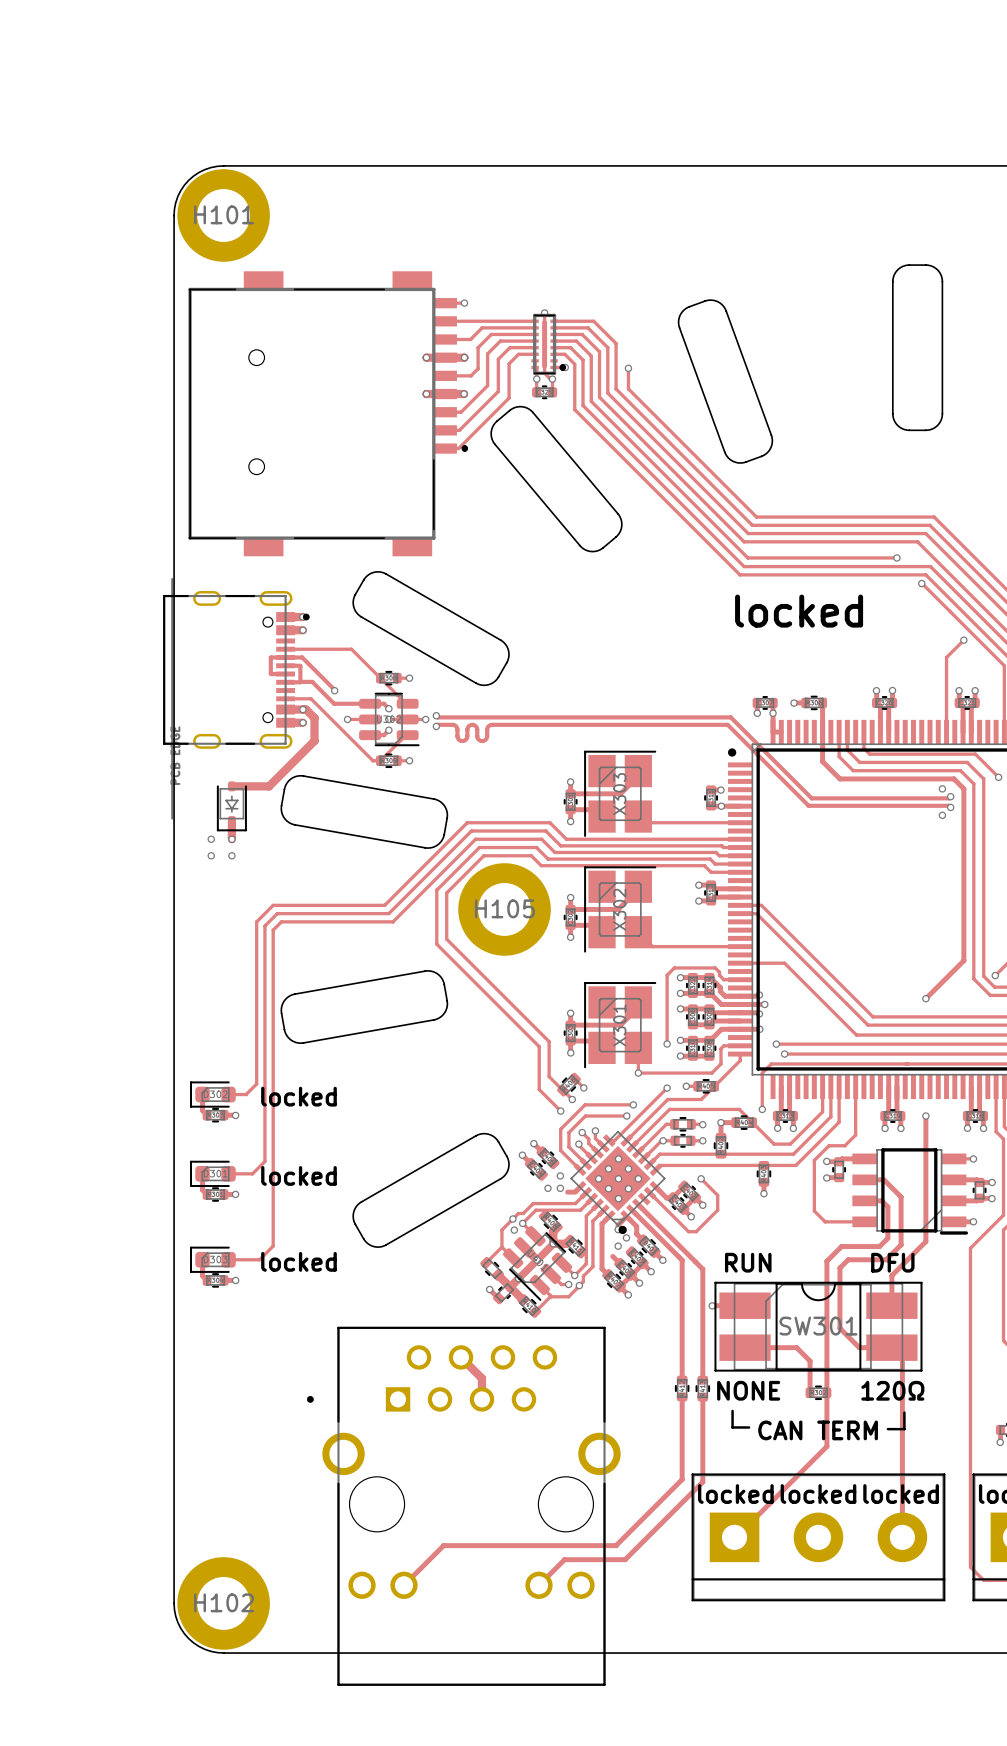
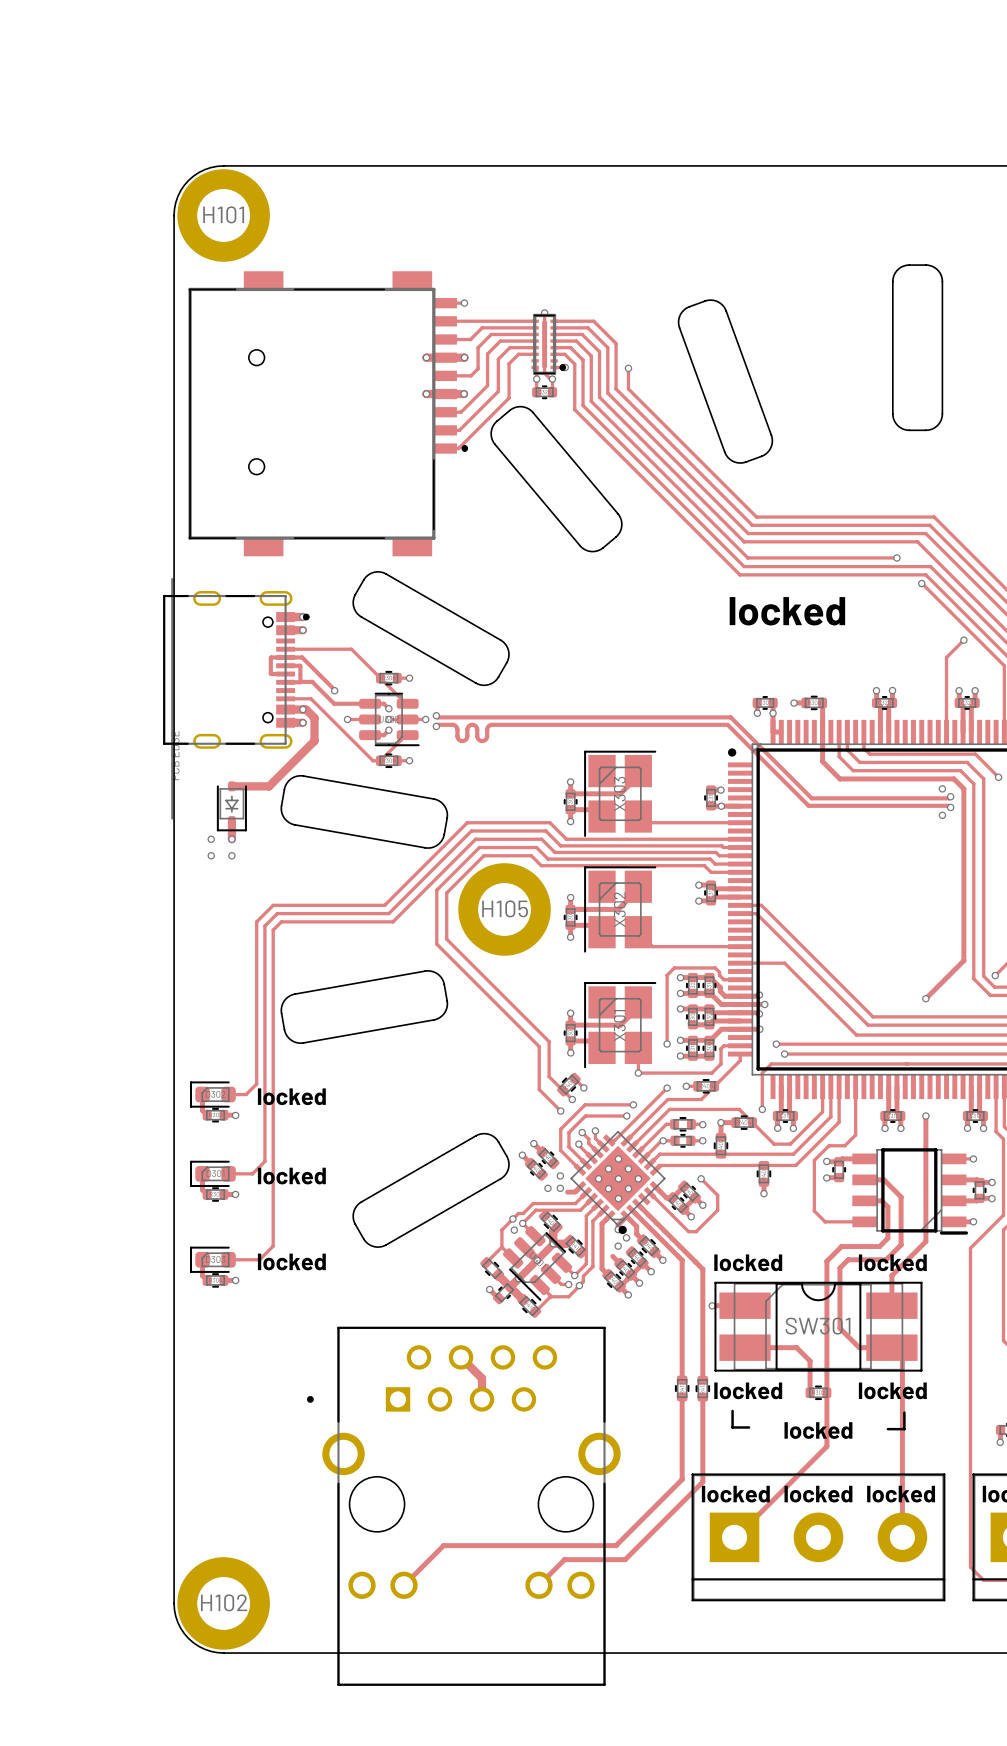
text: RUN (748, 1262) -> locked (748, 1262)
text: DFU (892, 1262) -> locked (892, 1262)
text: NONE (748, 1390) -> locked (748, 1390)
text: 120Ω (892, 1390) -> locked (892, 1390)
text: CAN TERM (818, 1430) -> locked (818, 1430)

